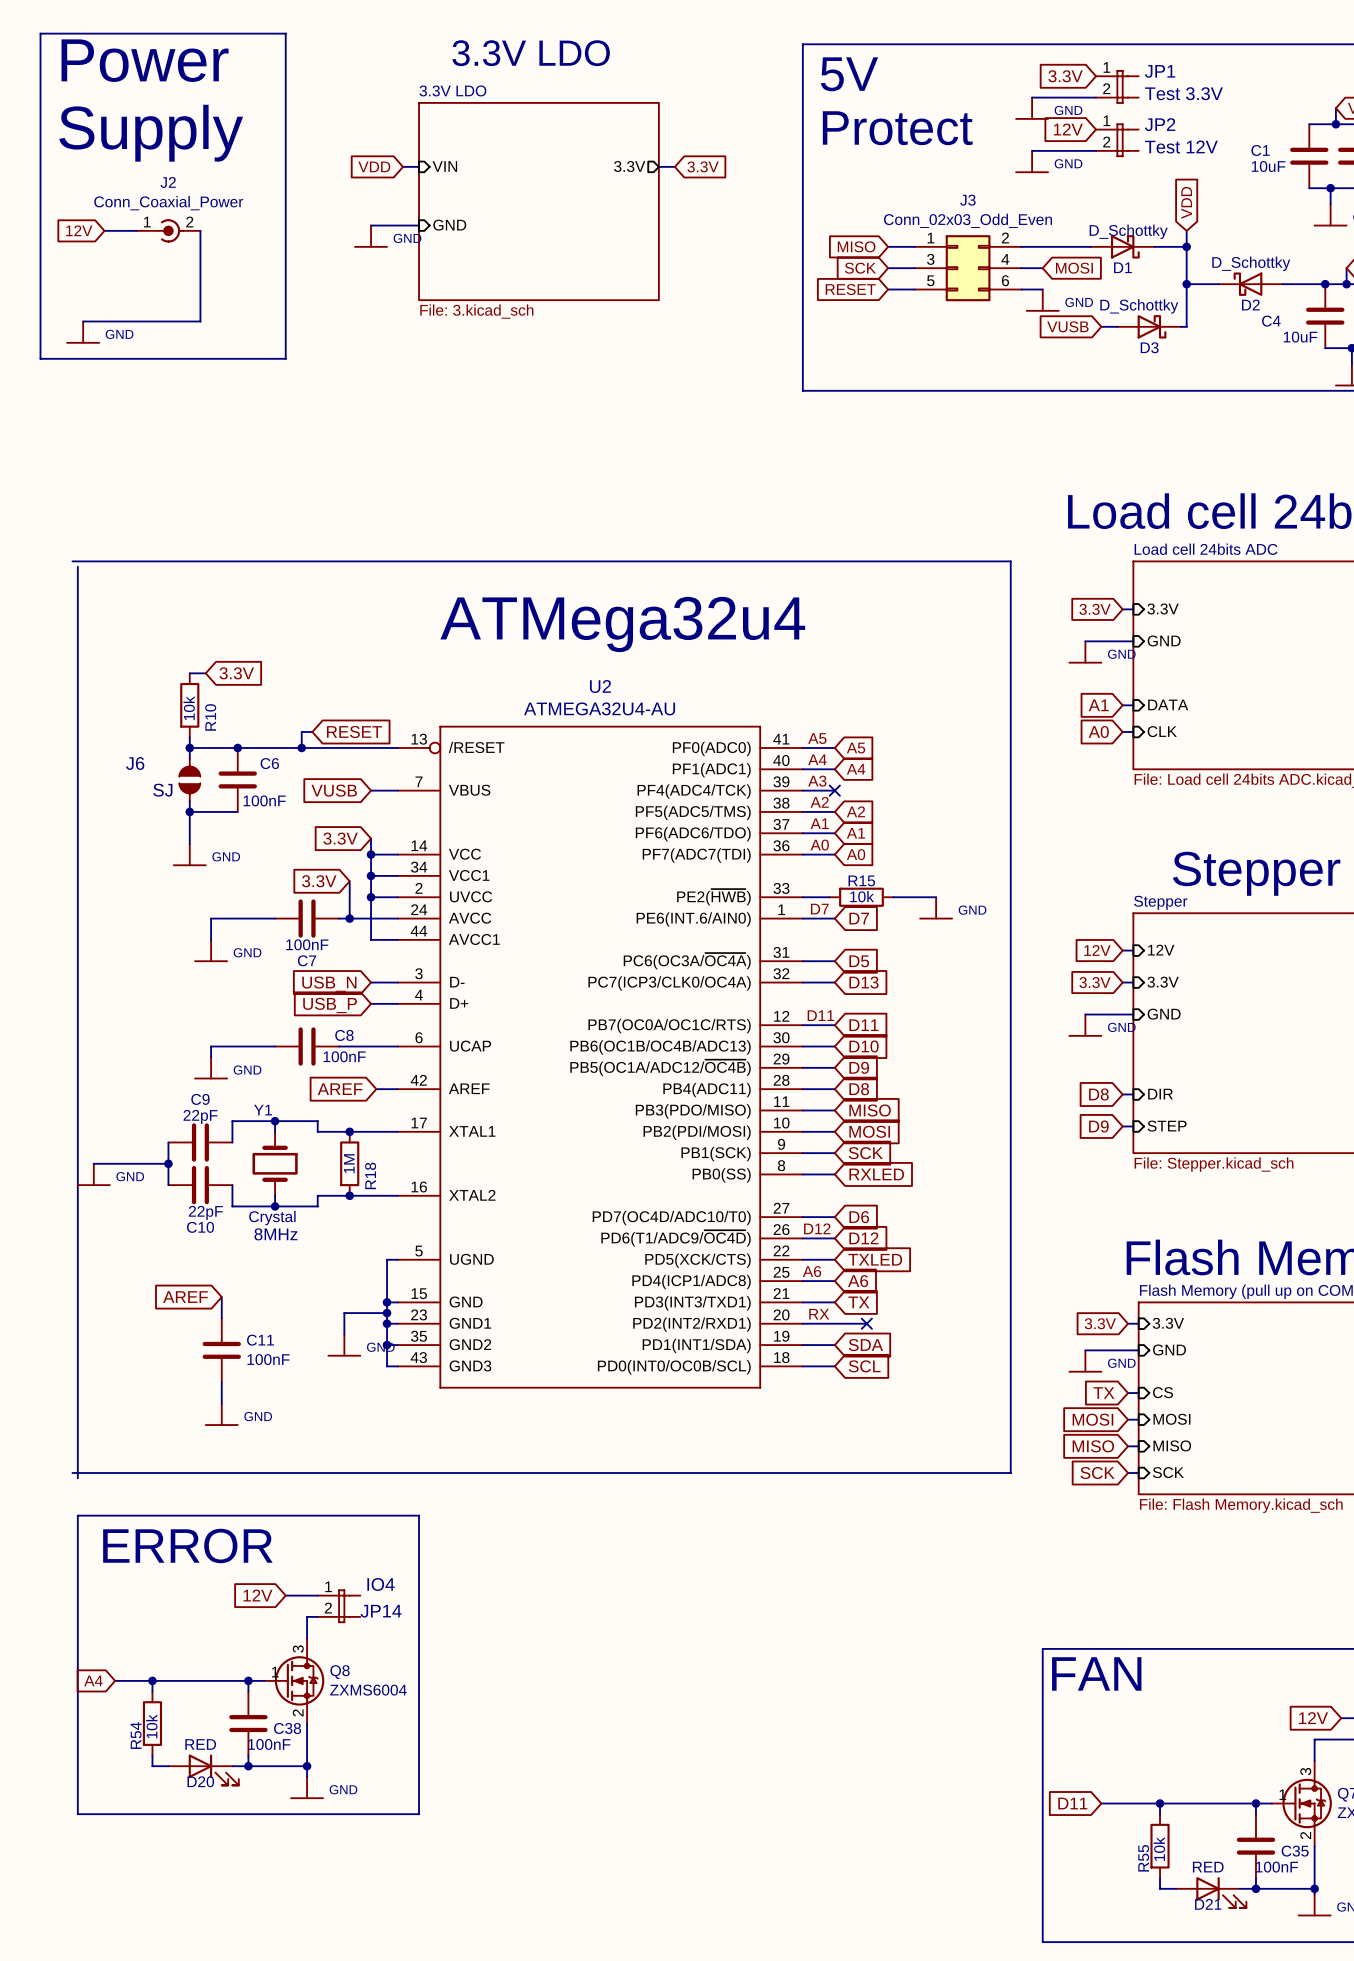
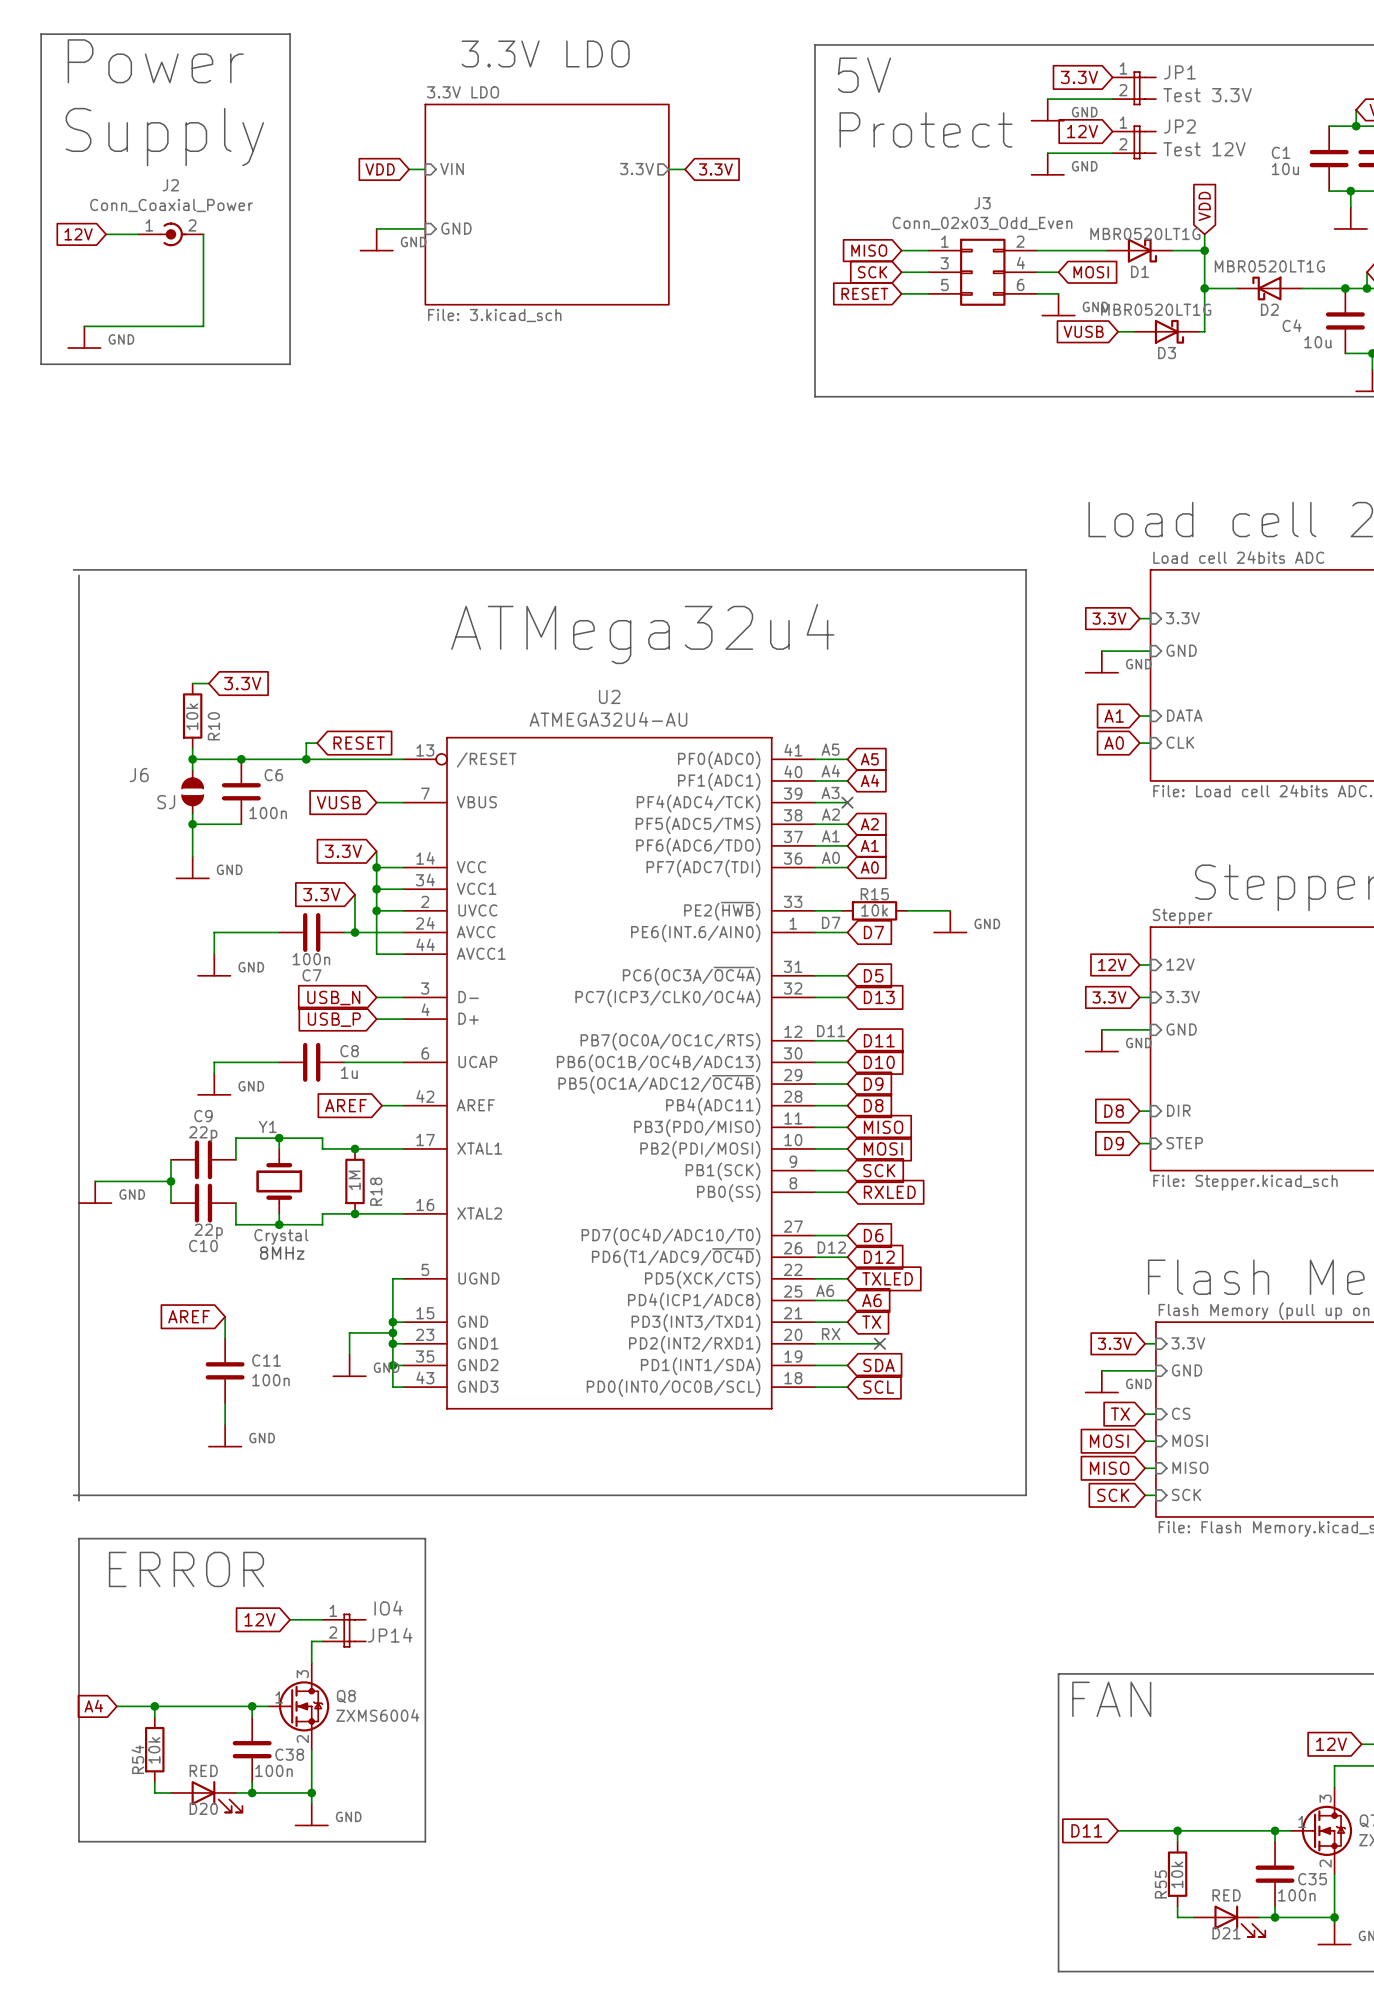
C1 value: 10uF (1268, 166) -> 10u (1285, 169)
D1 value: D_Schottky (1128, 231) -> MBR0520LT1G (1145, 233)
D2 value: D_Schottky (1251, 263) -> MBR0520LT1G (1269, 266)
D3 value: D_Schottky (1139, 306) -> MBR0520LT1G (1156, 309)
C4 value: 10uF (1300, 337) -> 10u (1317, 342)
C6 value: 100nF (264, 800) -> 100n (268, 813)
C7 value: 100nF (307, 944) -> 100n (311, 959)
C8 value: 100nF (344, 1056) -> 1u (349, 1072)
C9 value: 22pF (200, 1116) -> 22p (203, 1134)
C10 value: 22pF (205, 1212) -> 22p (208, 1231)
C11 value: 100nF (268, 1359) -> 100n (270, 1380)
C38 value: 100nF (269, 1744) -> 100n (274, 1770)
C35 value: 100nF (1276, 1867) -> 100n (1296, 1895)

